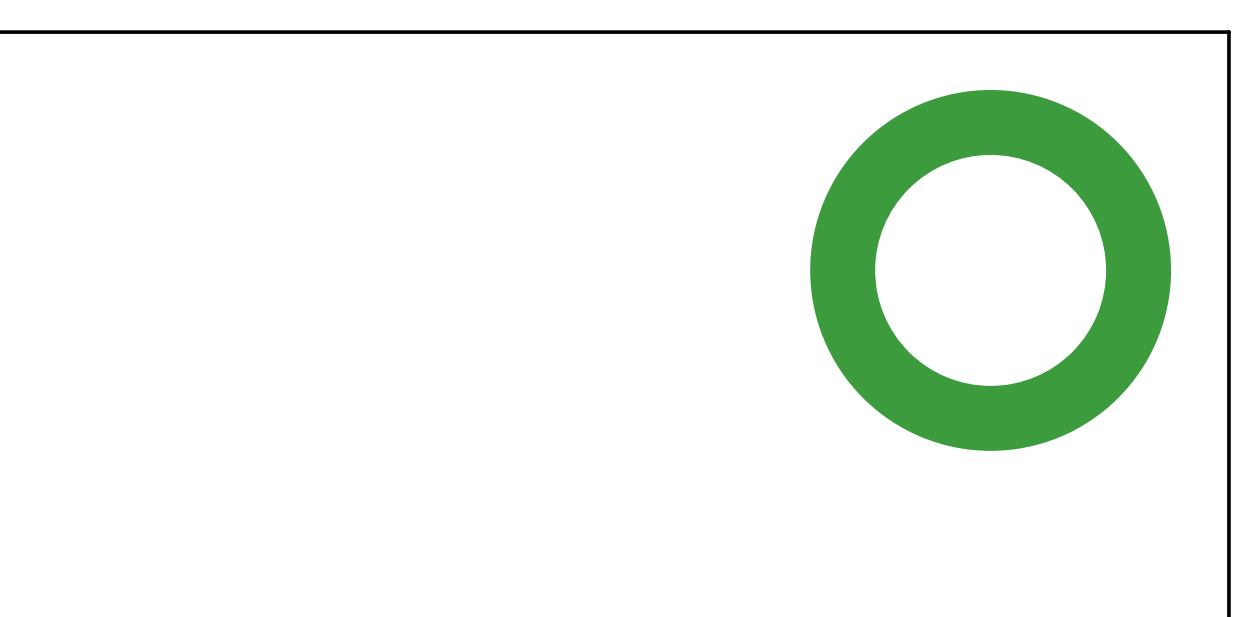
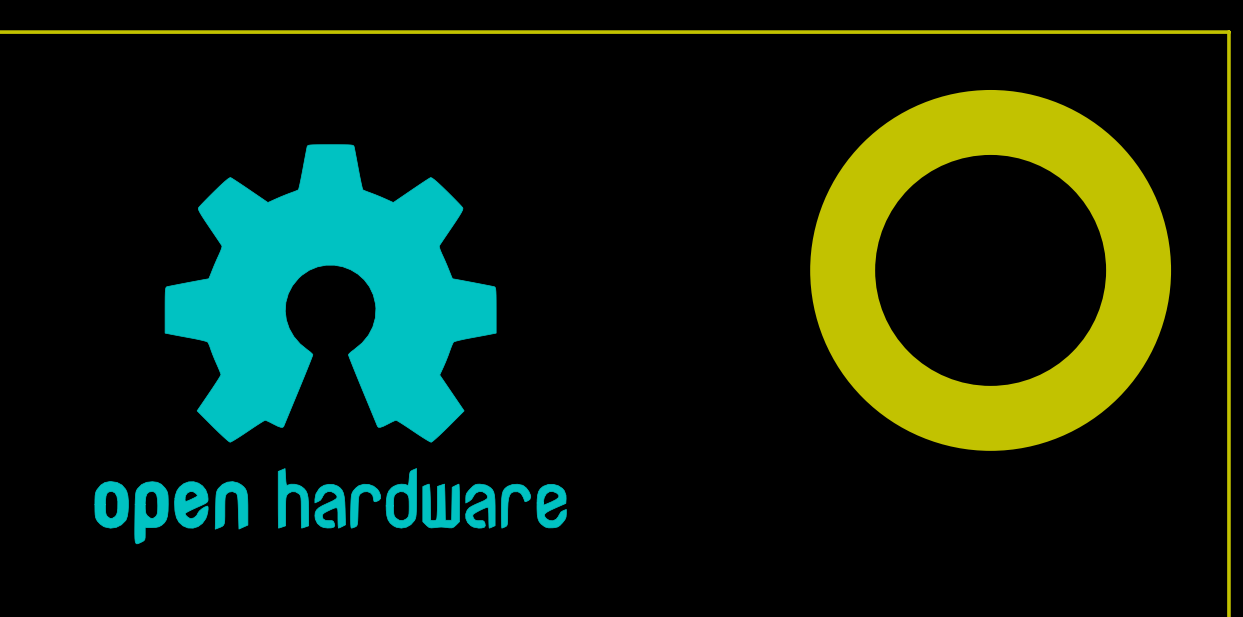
drawing: none -> [94, 144, 567, 545]

